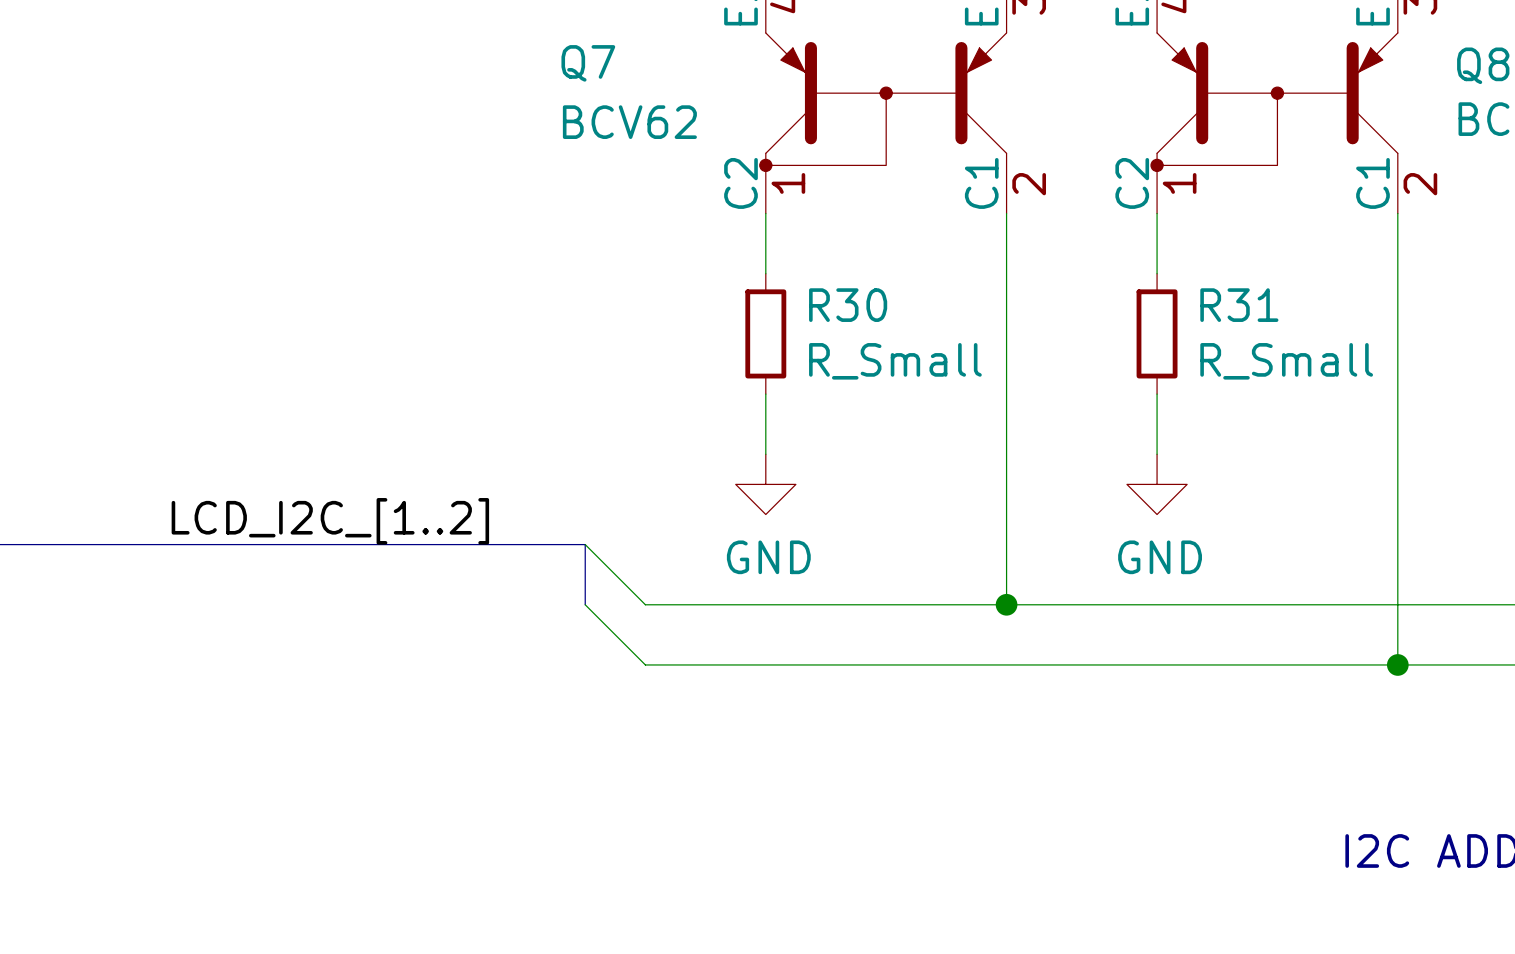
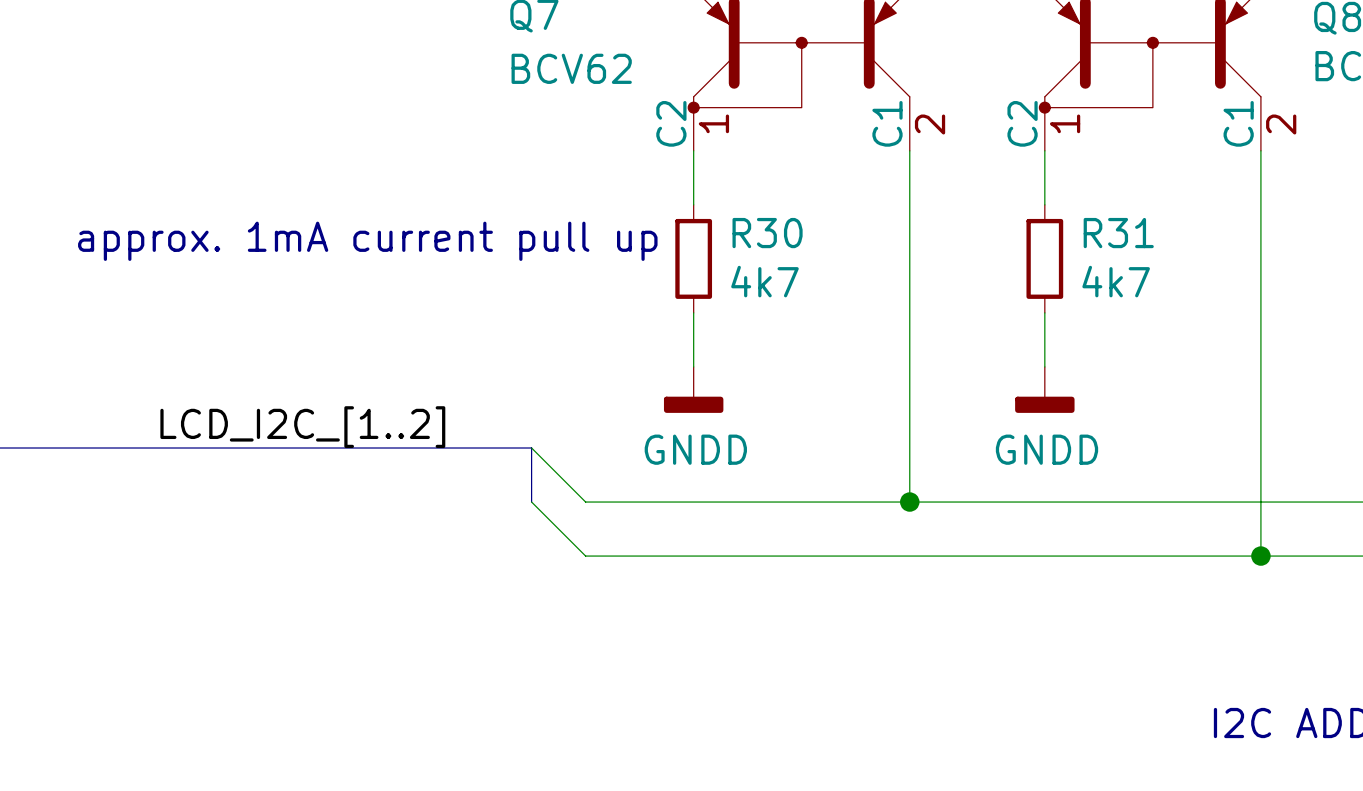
text: none -> approx. 1mA current pull up (367, 241)
R30 value: R_Small (895, 361) -> 4k7 (764, 281)
R31 value: R_Small (1286, 361) -> 4k7 (1116, 281)
power symbol: GND (765, 484) -> GNDD (693, 389)
power symbol: GND (1157, 484) -> GNDD (1044, 389)

